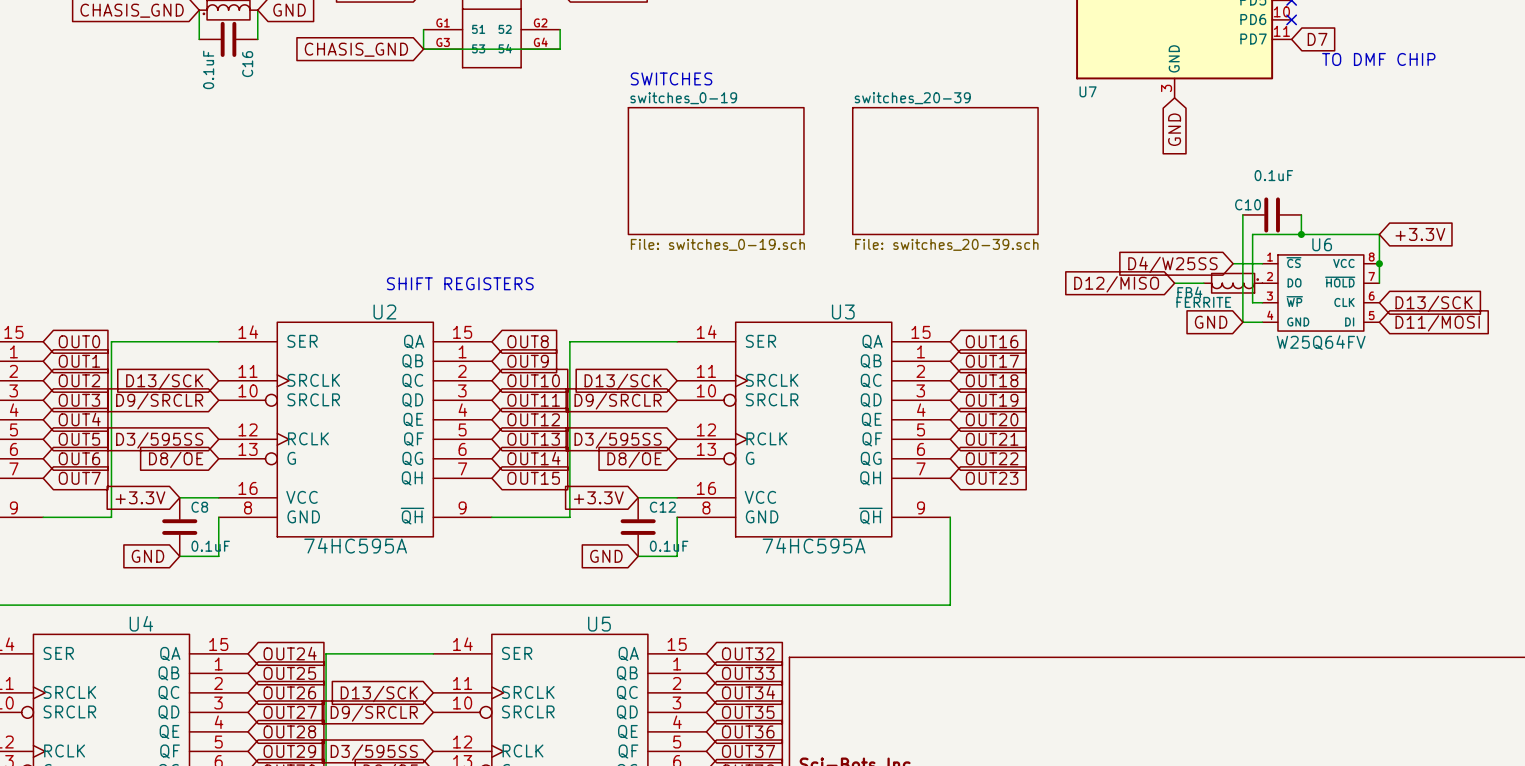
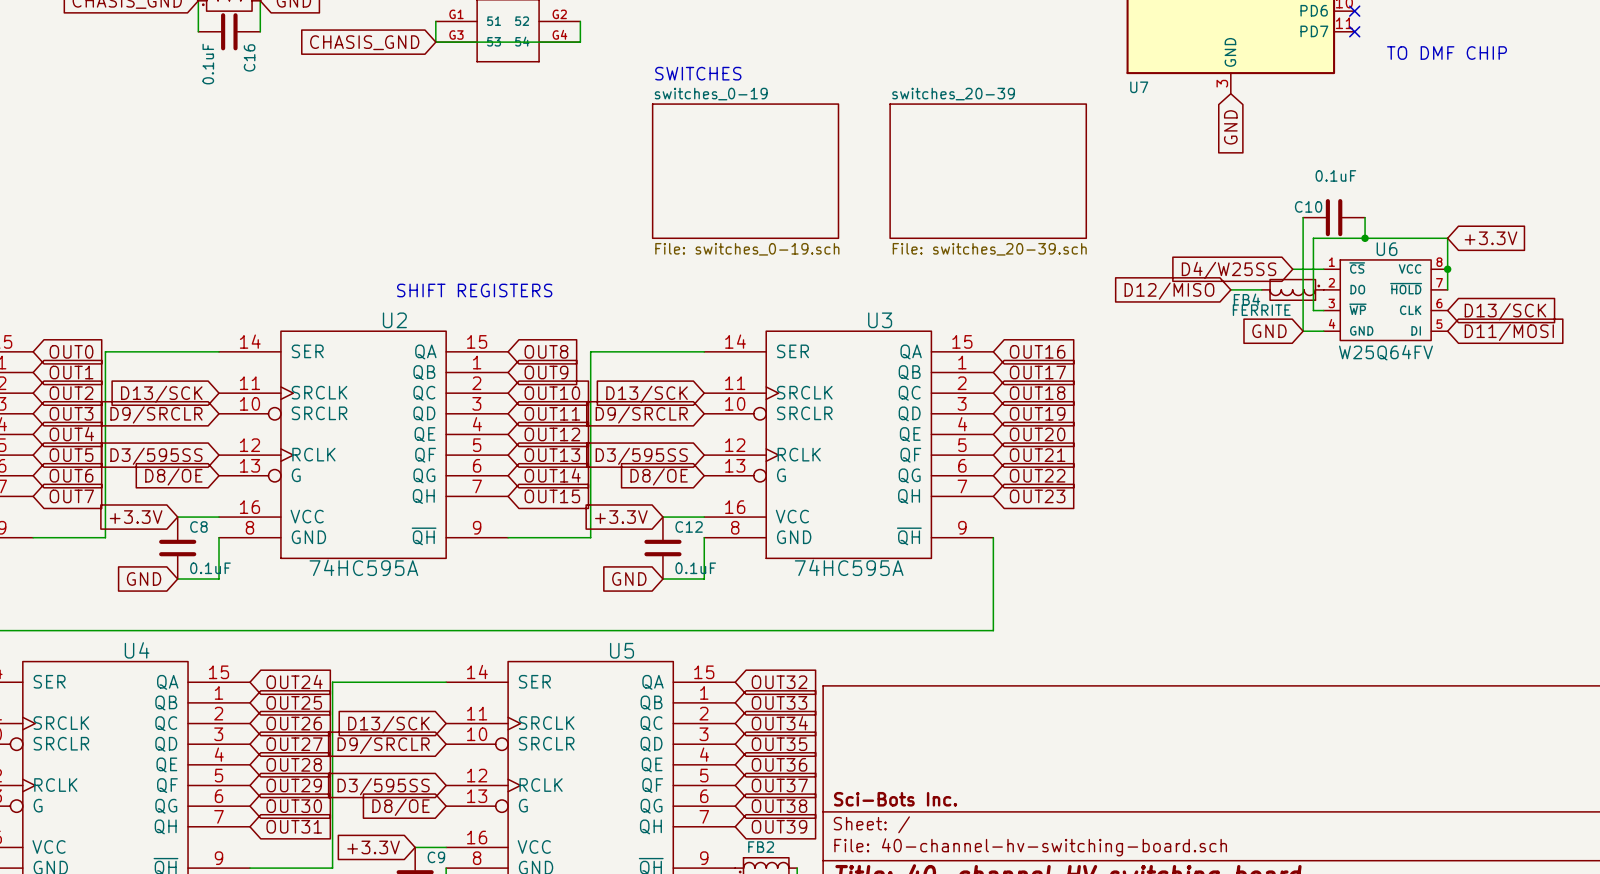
no-connect mark: none -> (1354, 31)
global label: D7 (1317, 39) -> none

